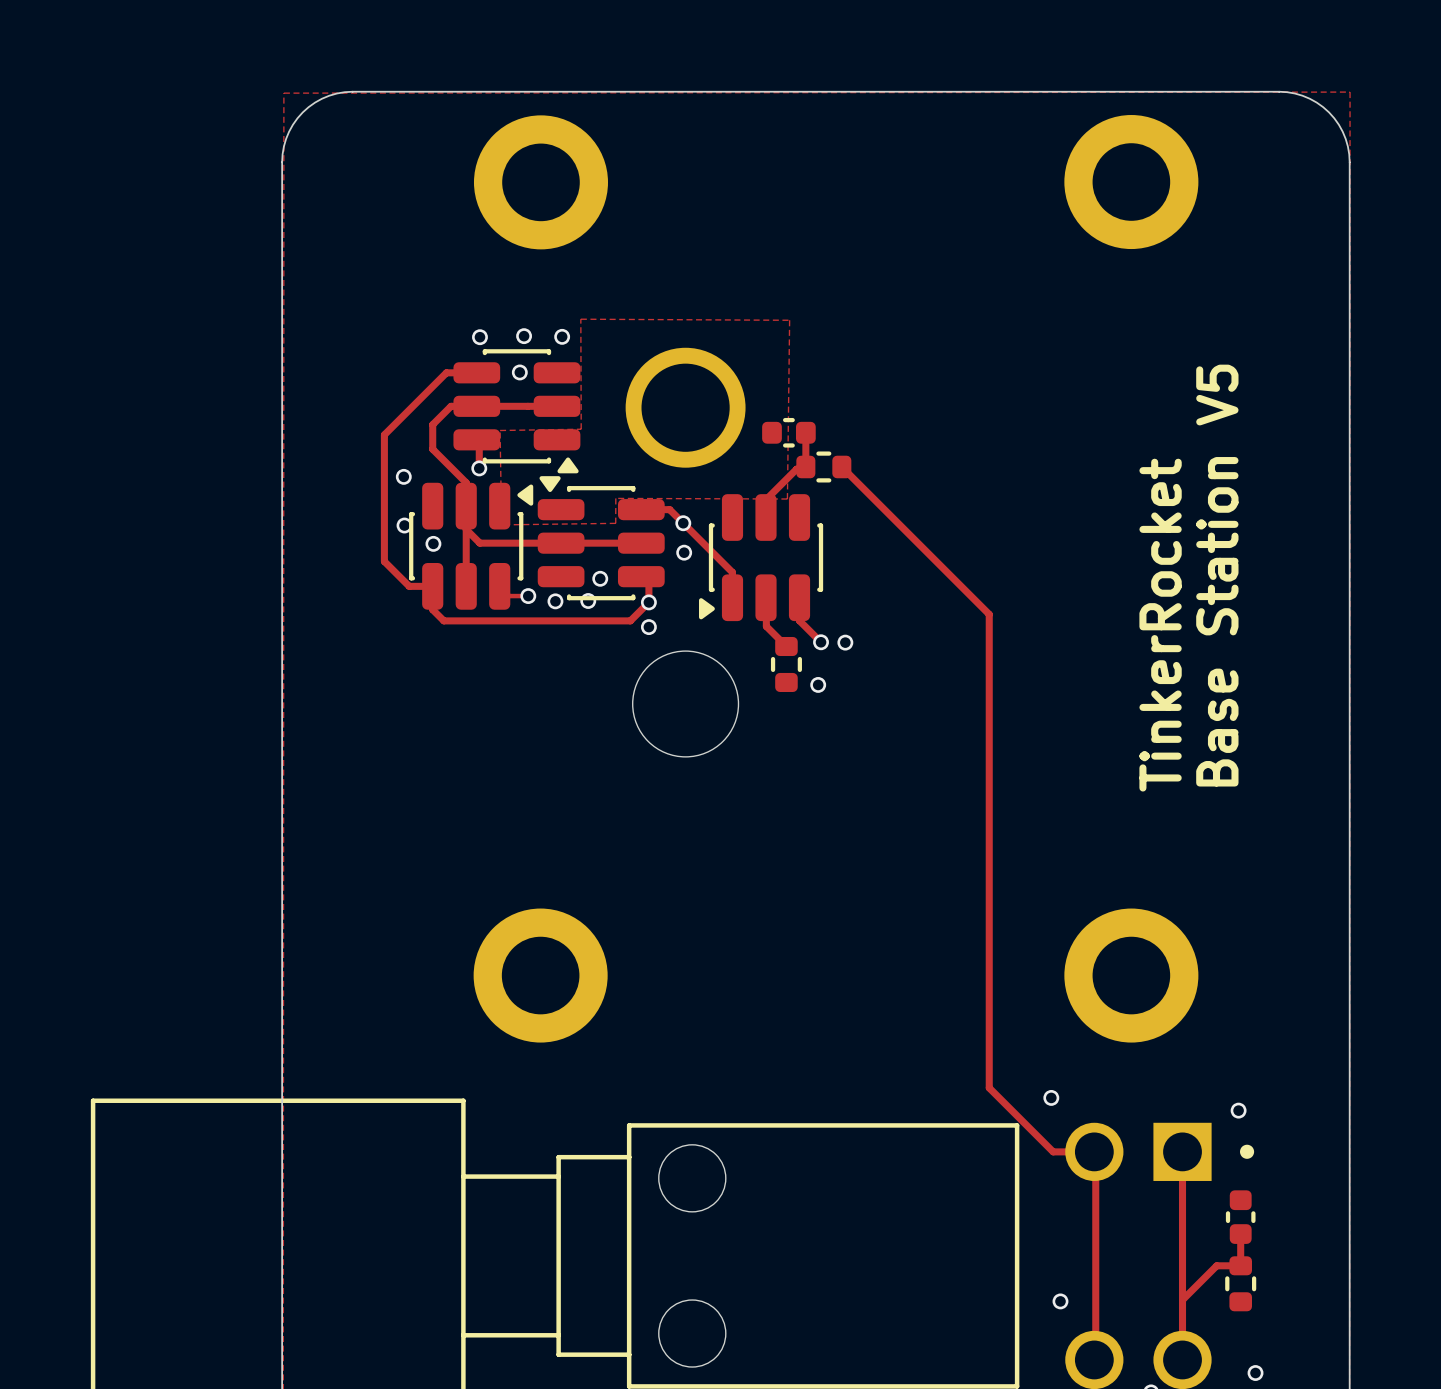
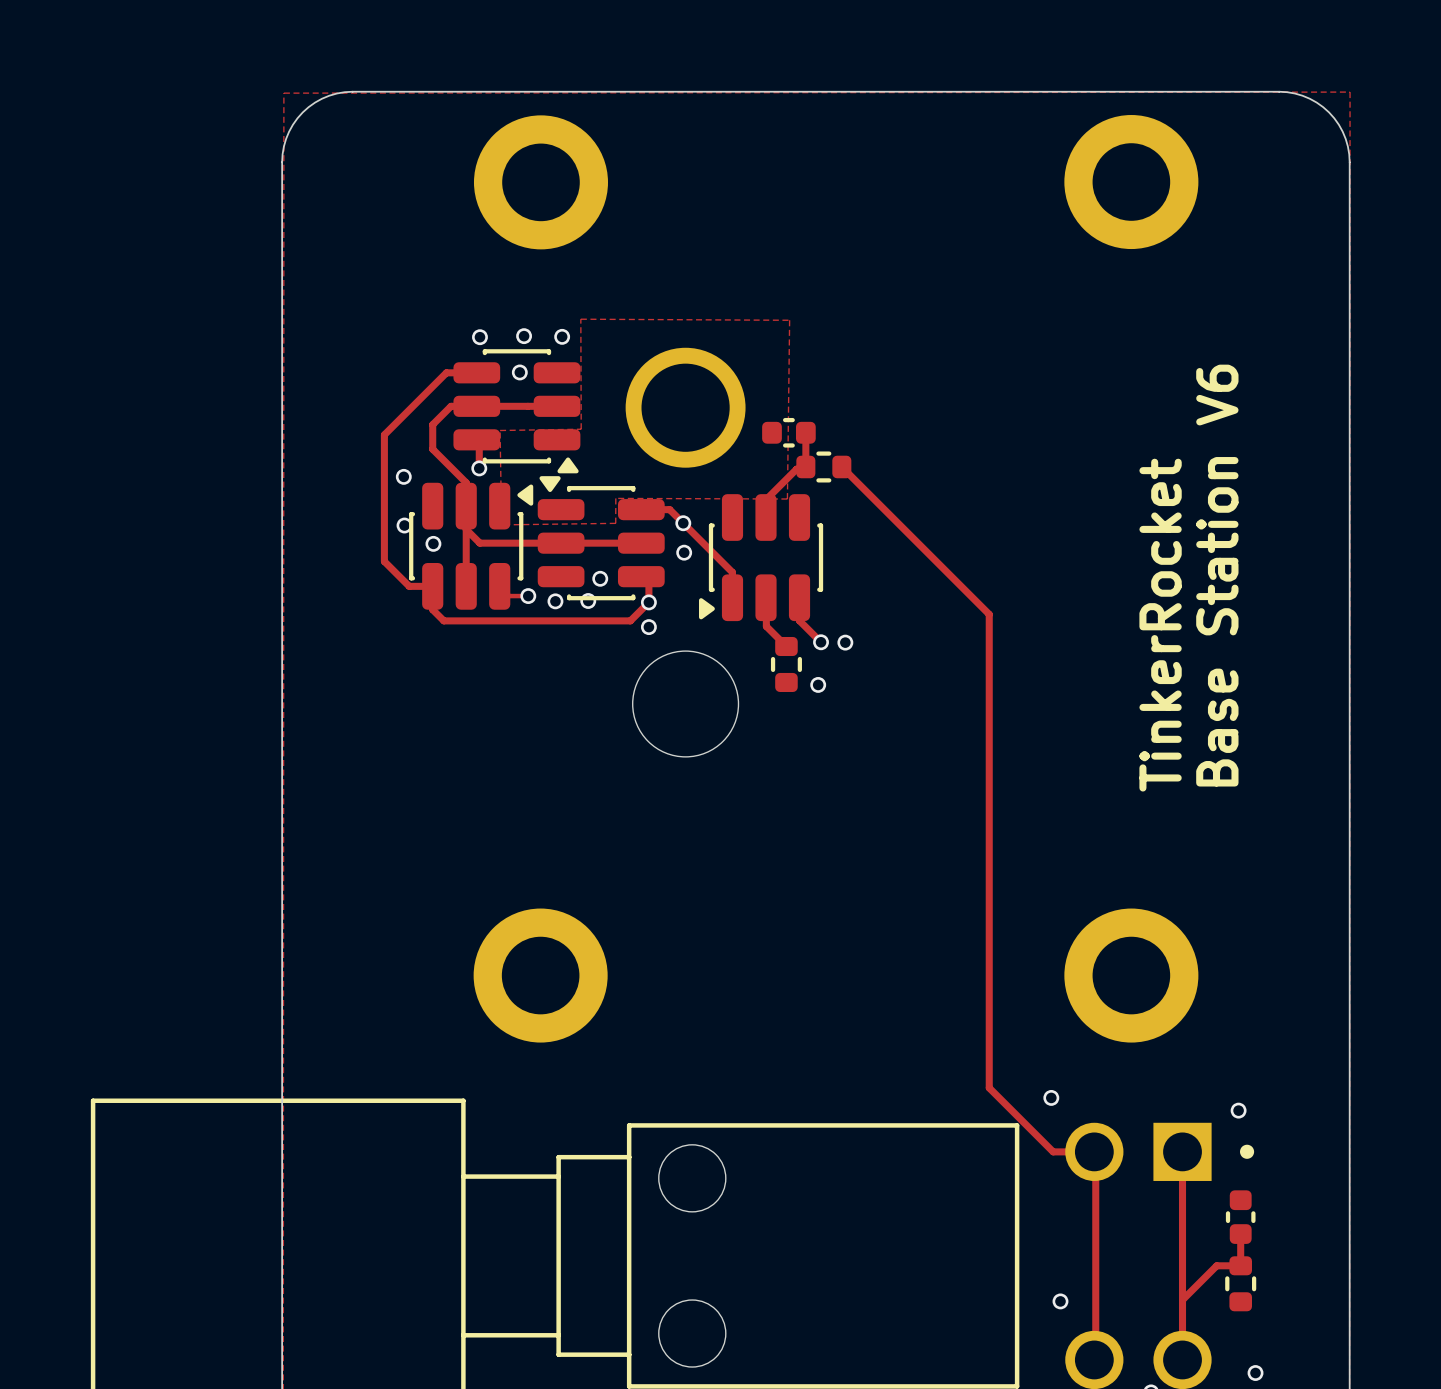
text: Base Station V5 (1217, 575) -> Base Station V6 (1217, 575)

